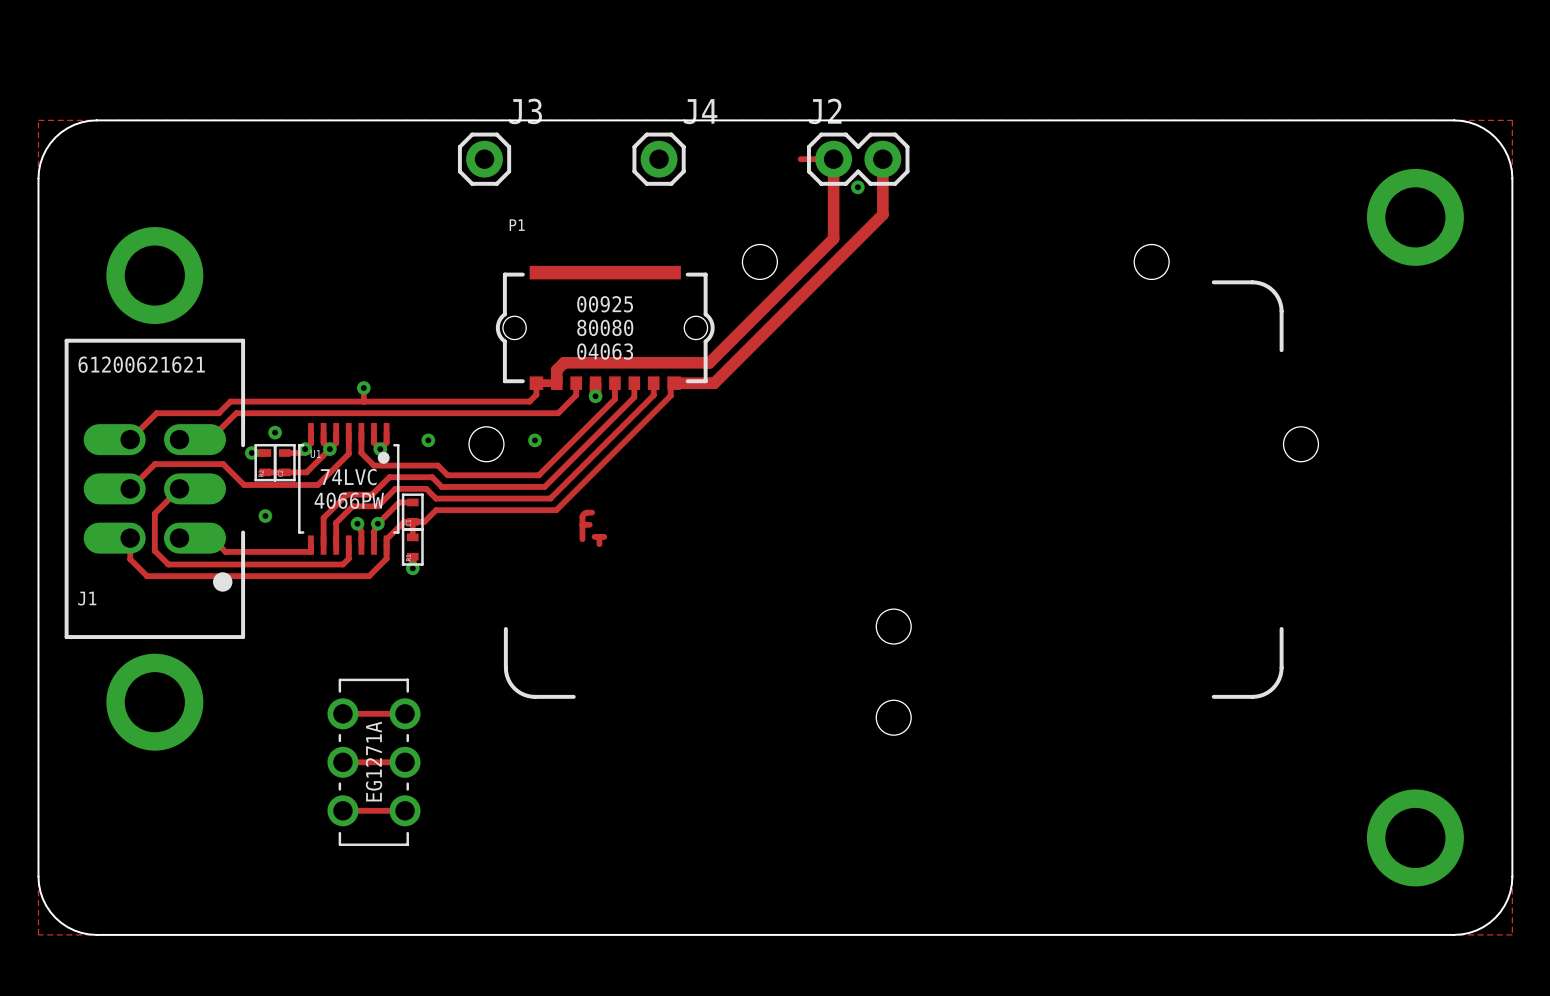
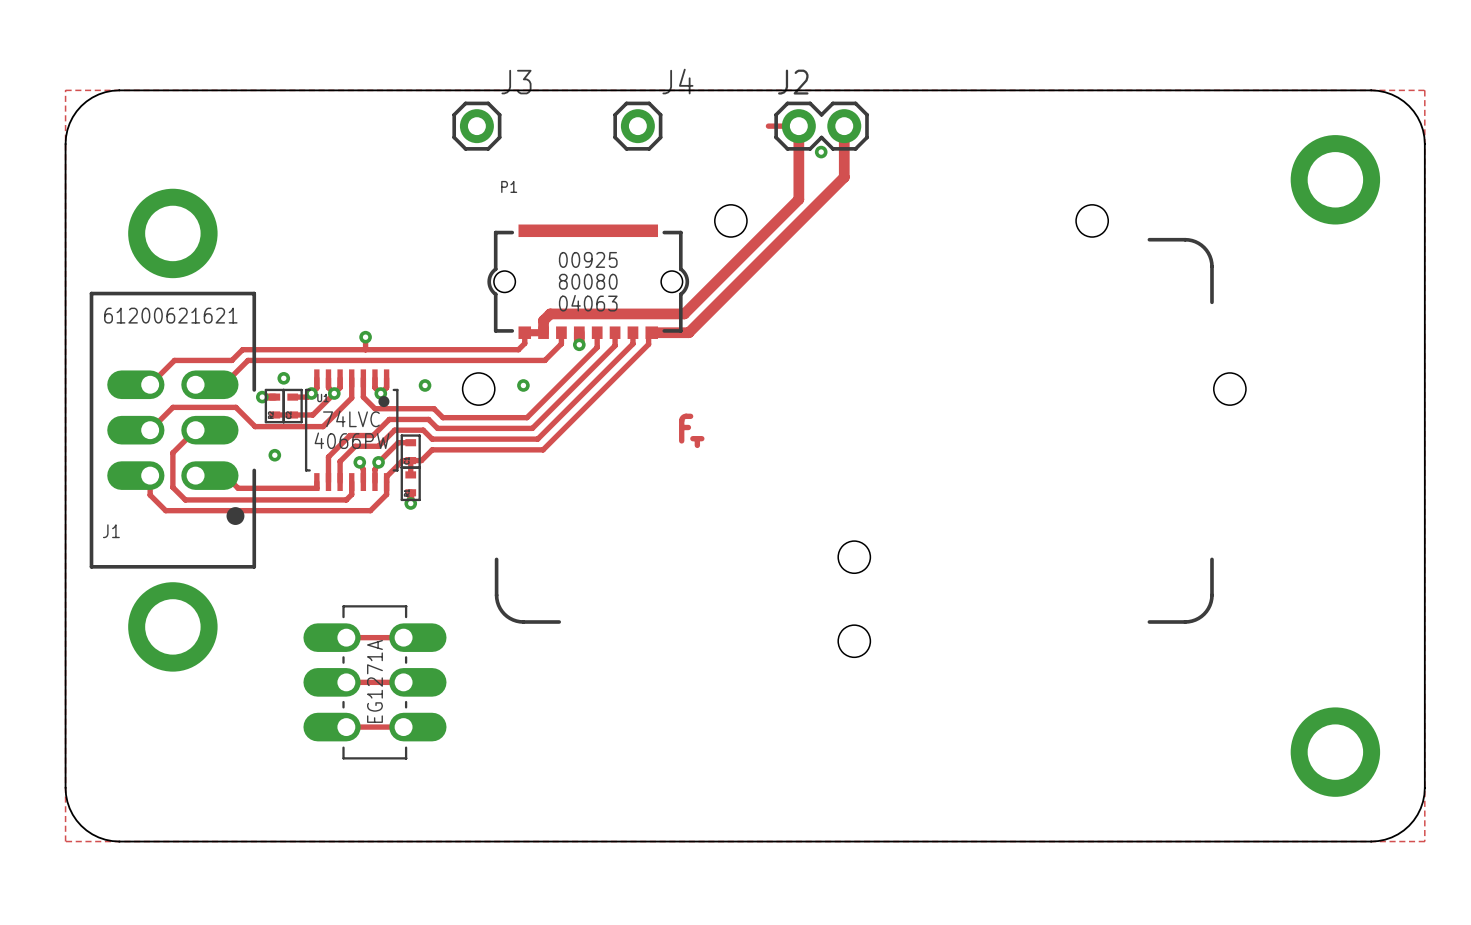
drawing position: (593, 528) -> (691, 430)
part footprint: [327, 678, 421, 846] -> [303, 605, 447, 760]

